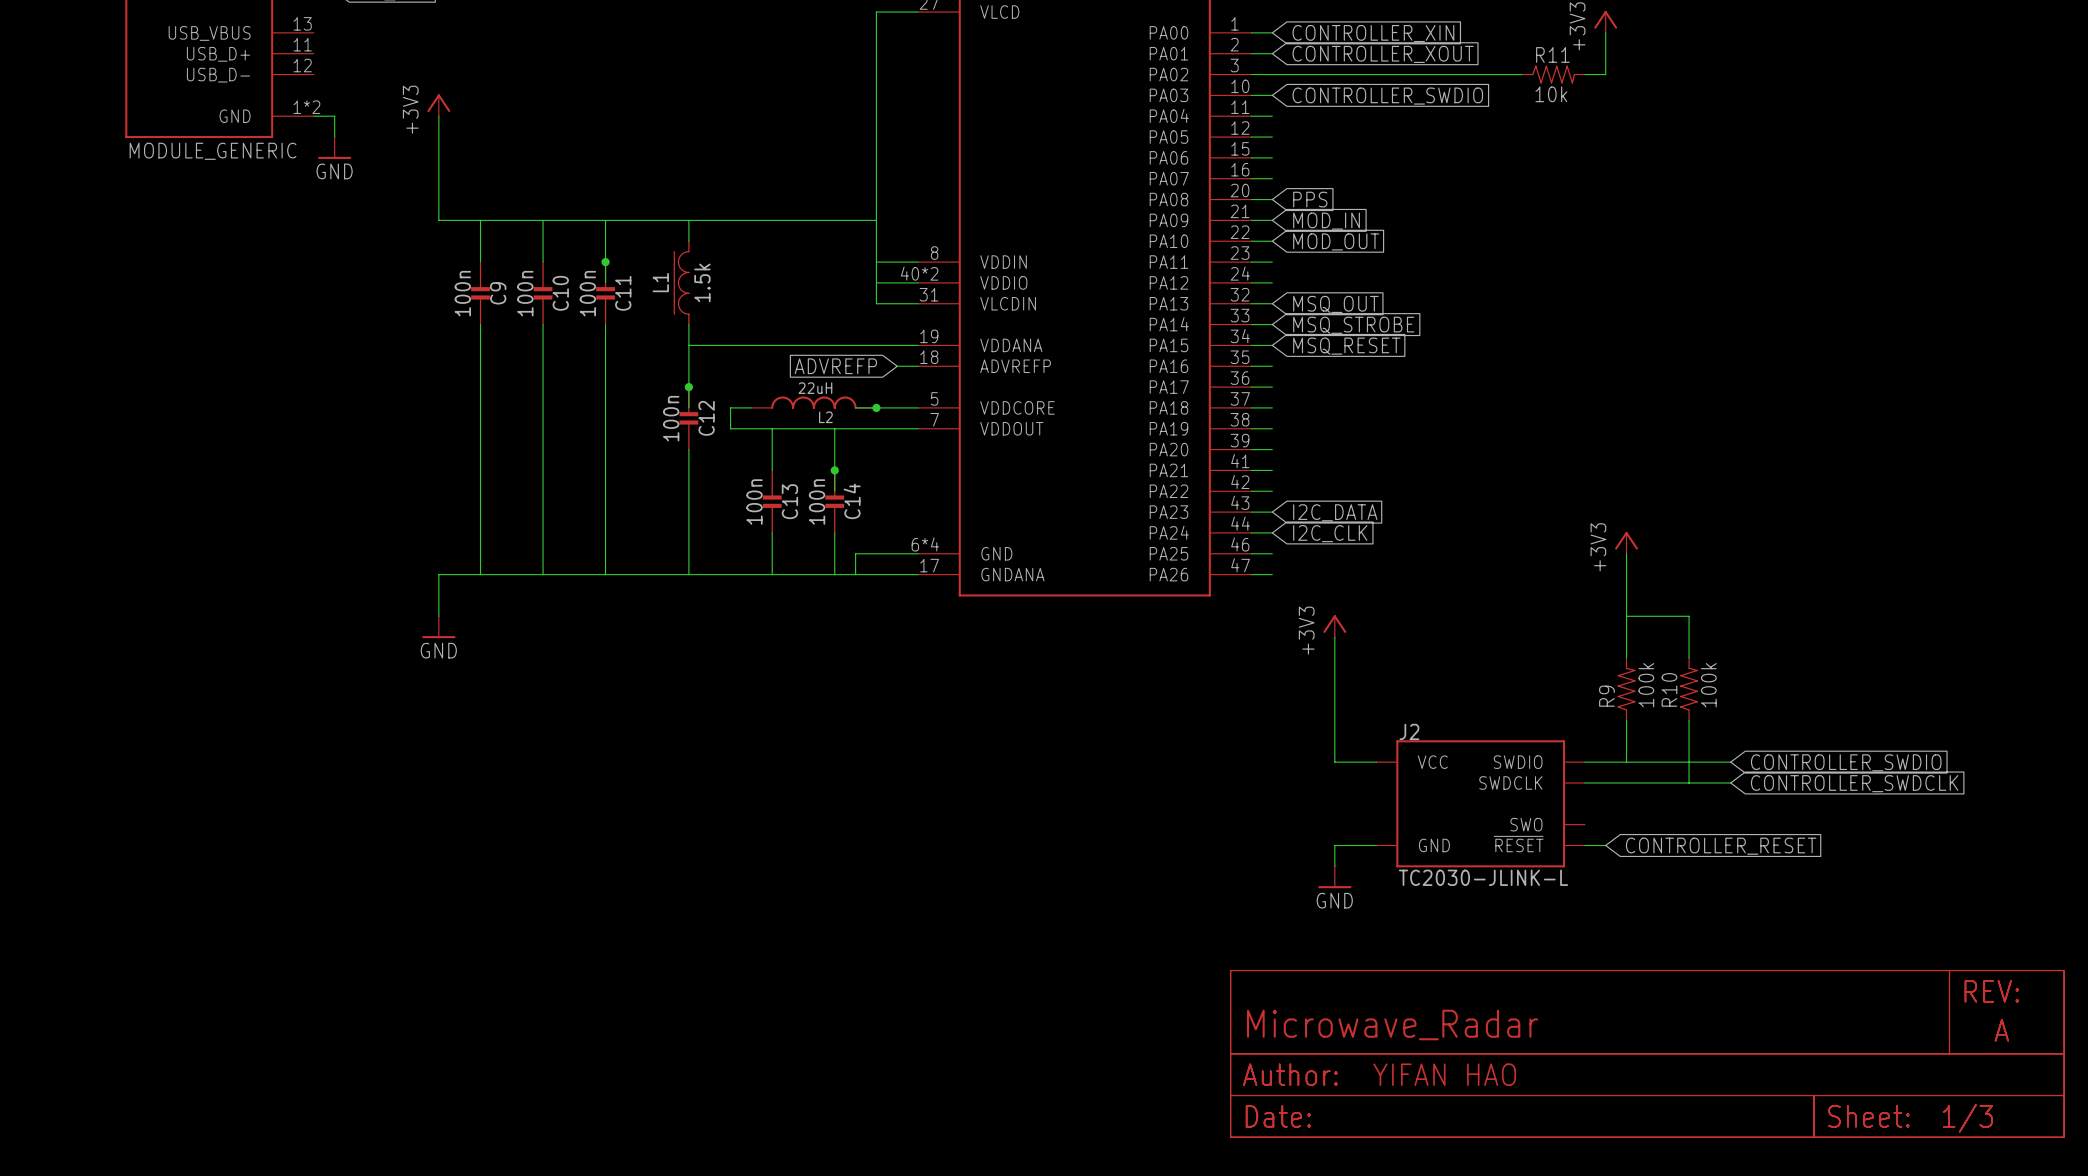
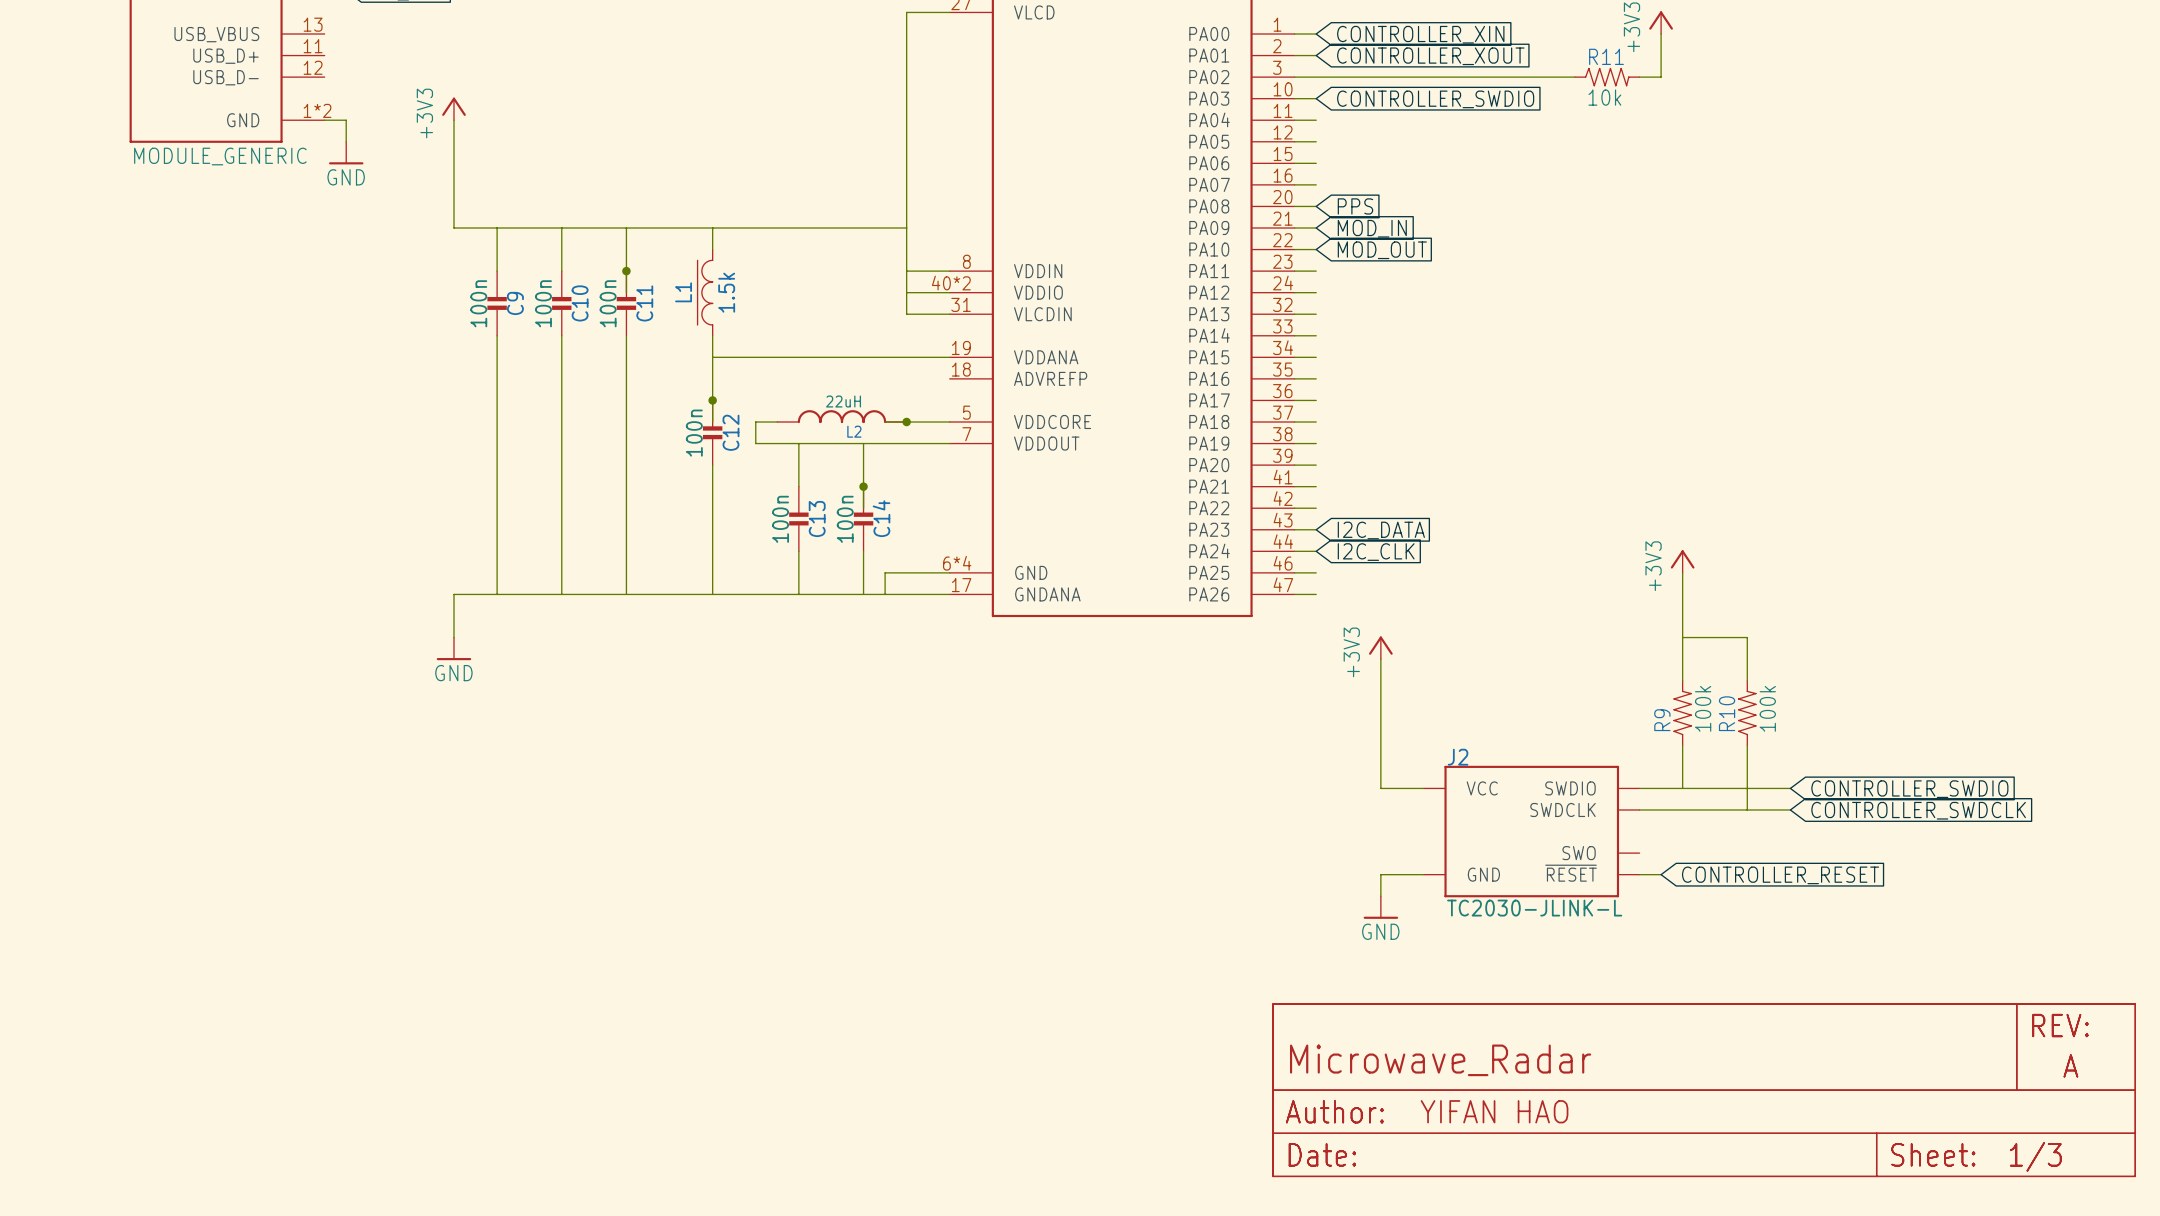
global label: MSQ_OUT (1335, 304) -> none
global label: MSQ_STROBE (1353, 325) -> none
global label: MSQ_RESET (1346, 346) -> none
global label: ADVREFP (835, 366) -> none
wire: (897, 366) (918, 366) -> none

